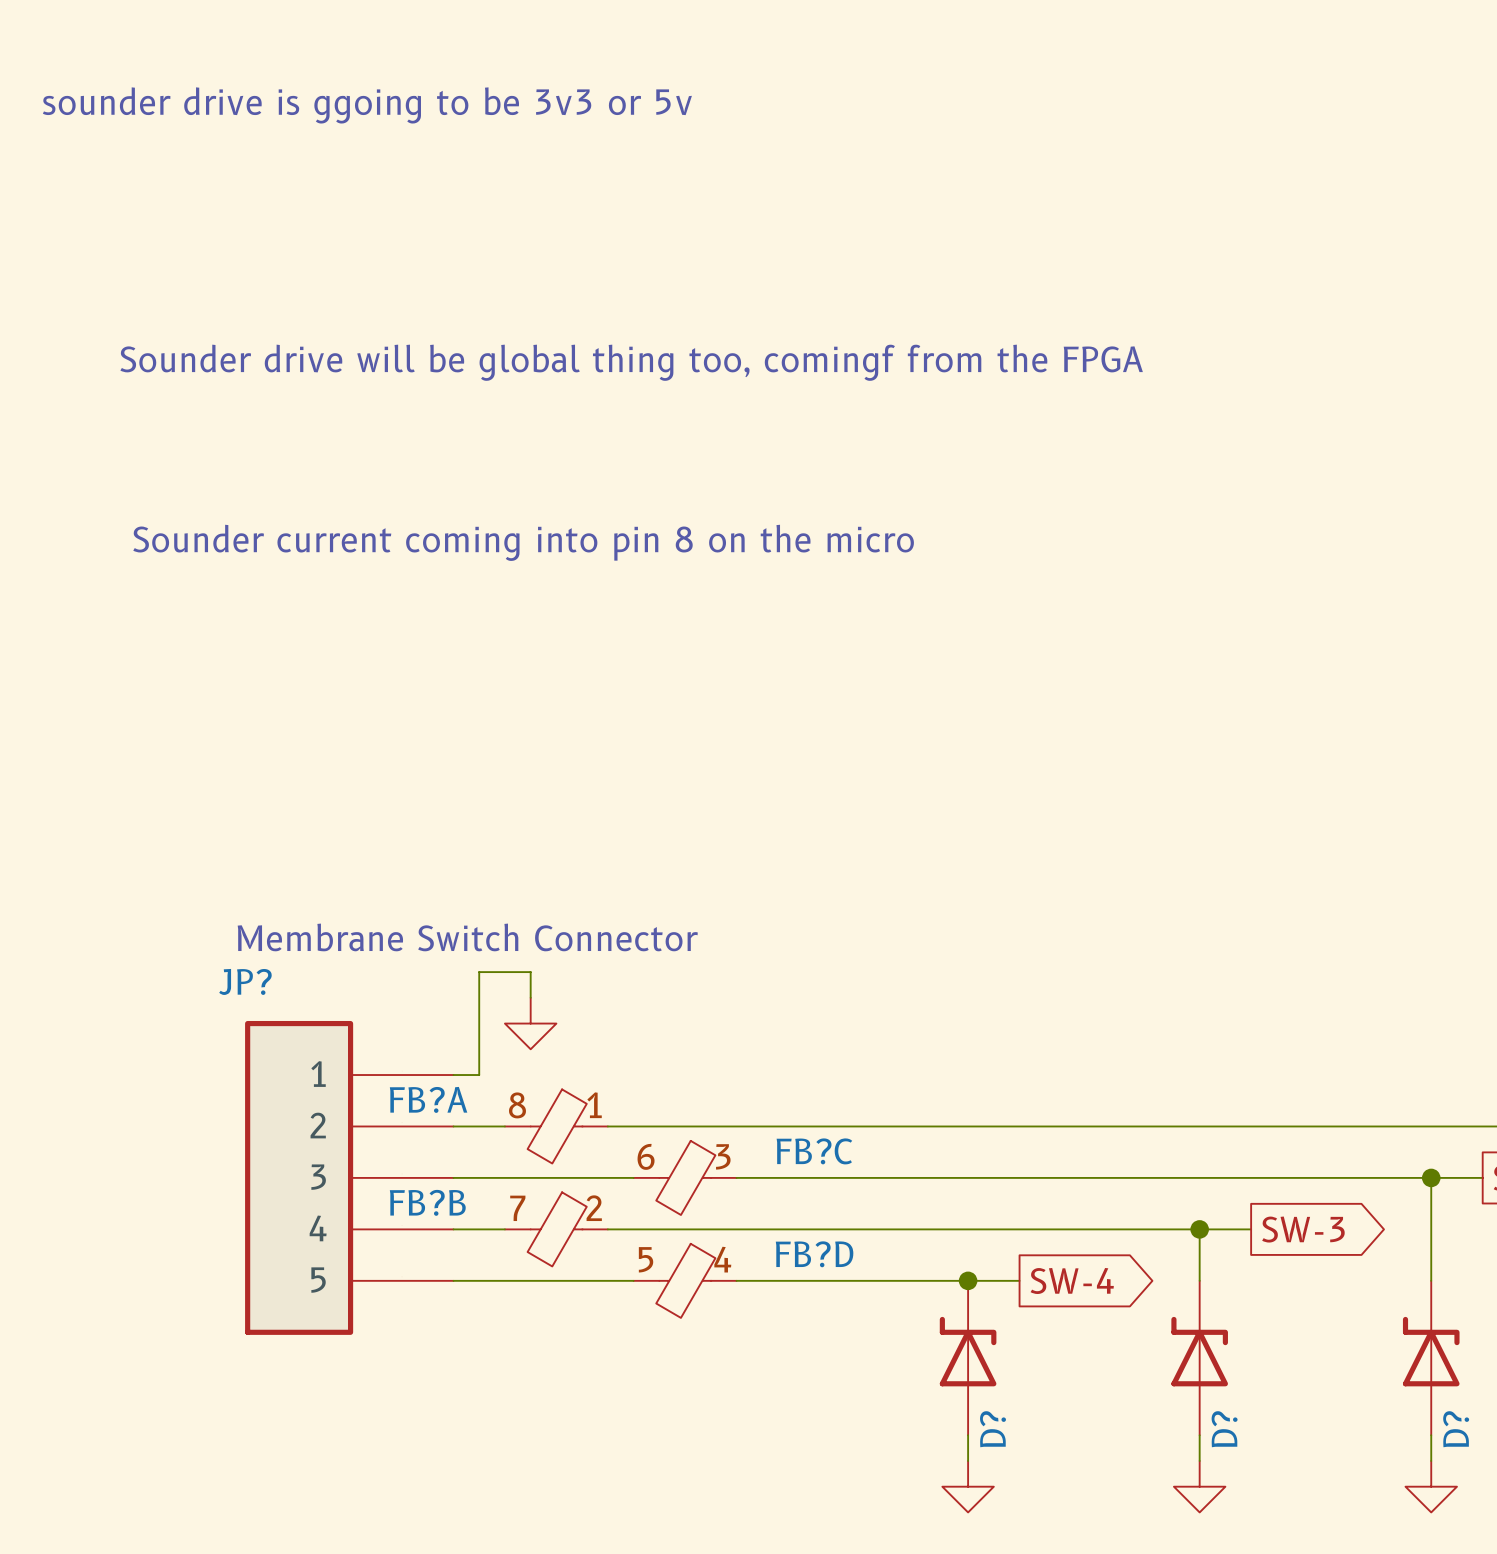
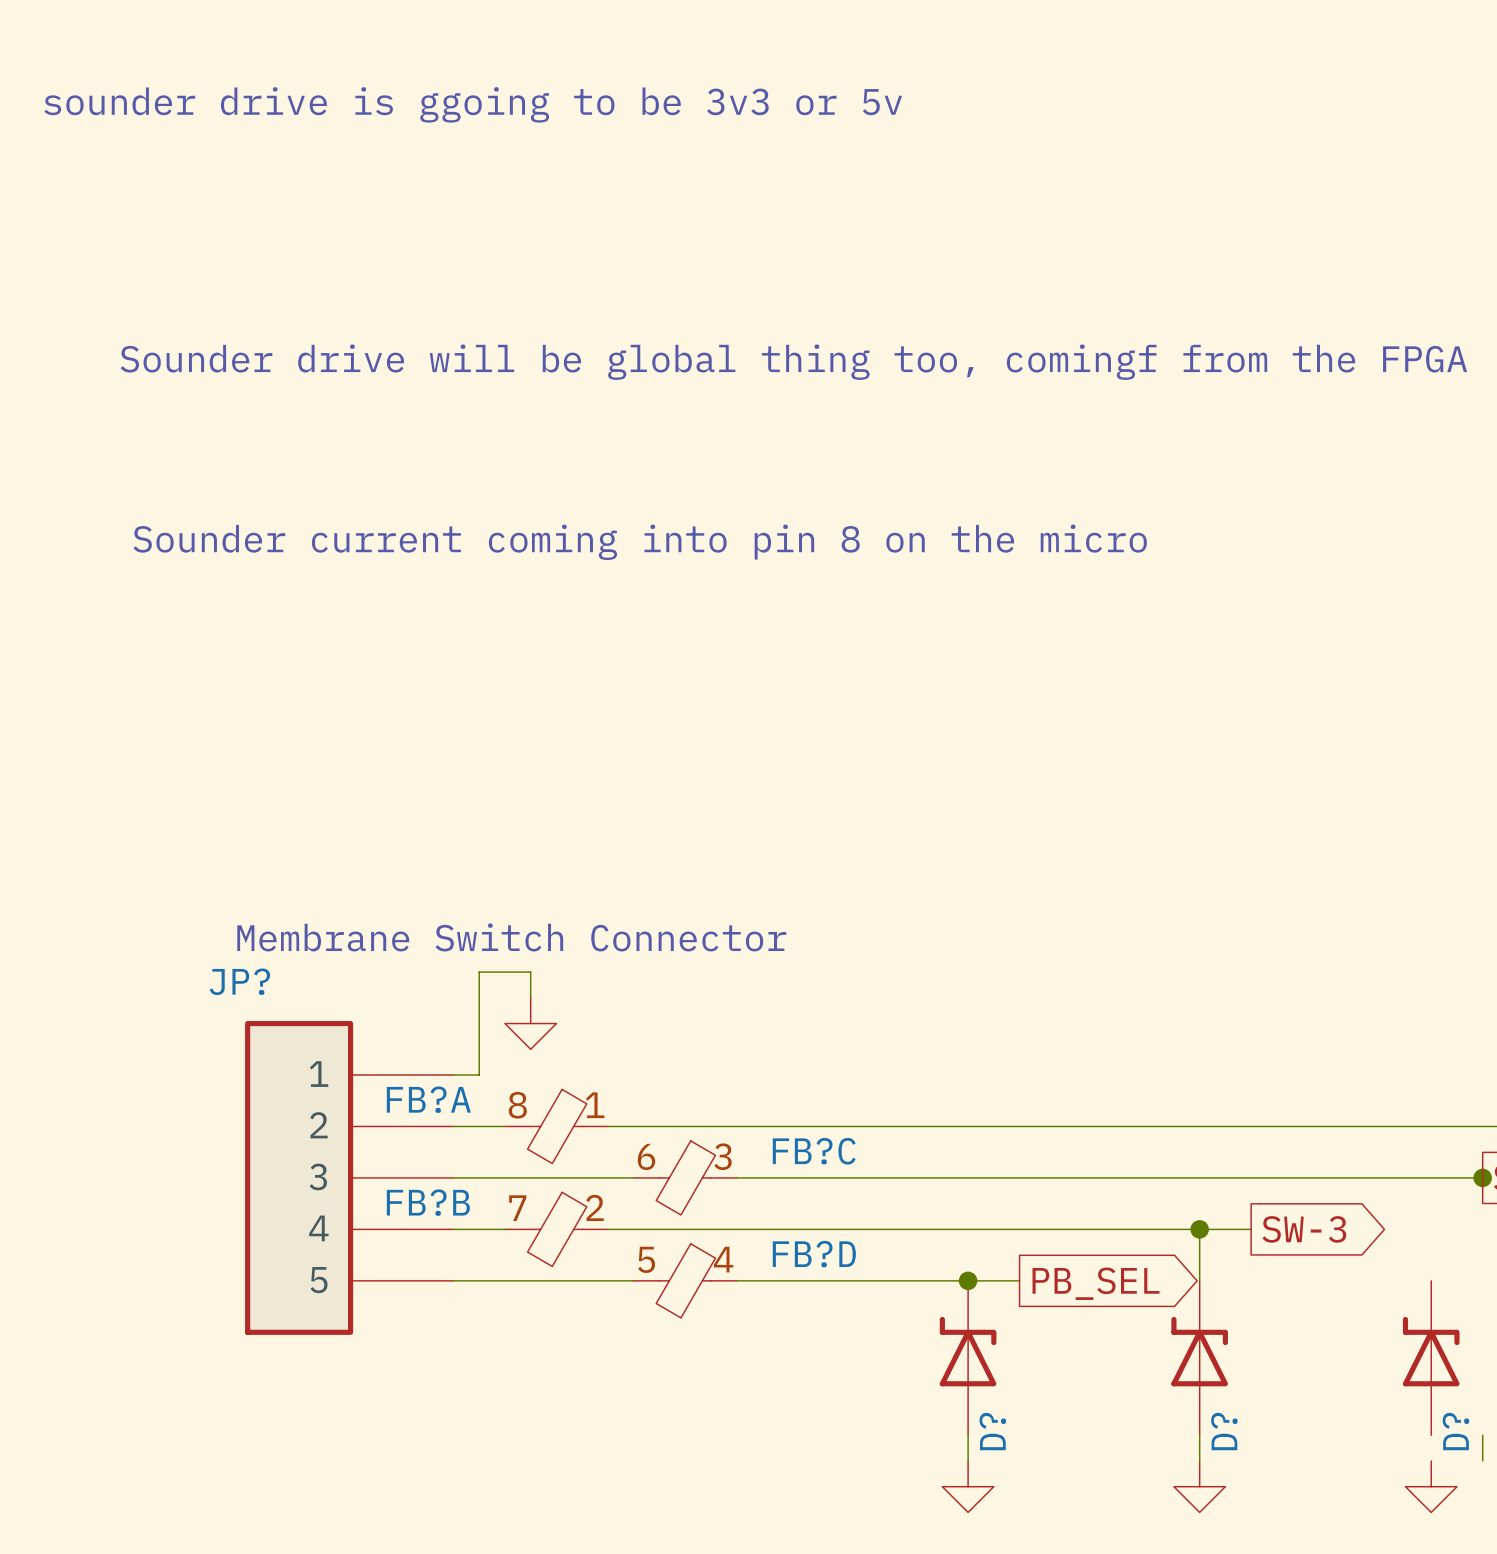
wire: (1431, 1177) (1431, 1280) -> none
junction position: (1431, 1177) -> (1482, 1177)
global label: SW-4 (1072, 1280) -> PB_SEL (1096, 1283)
wire: (1431, 1435) (1431, 1460) -> (1482, 1435) (1482, 1460)

